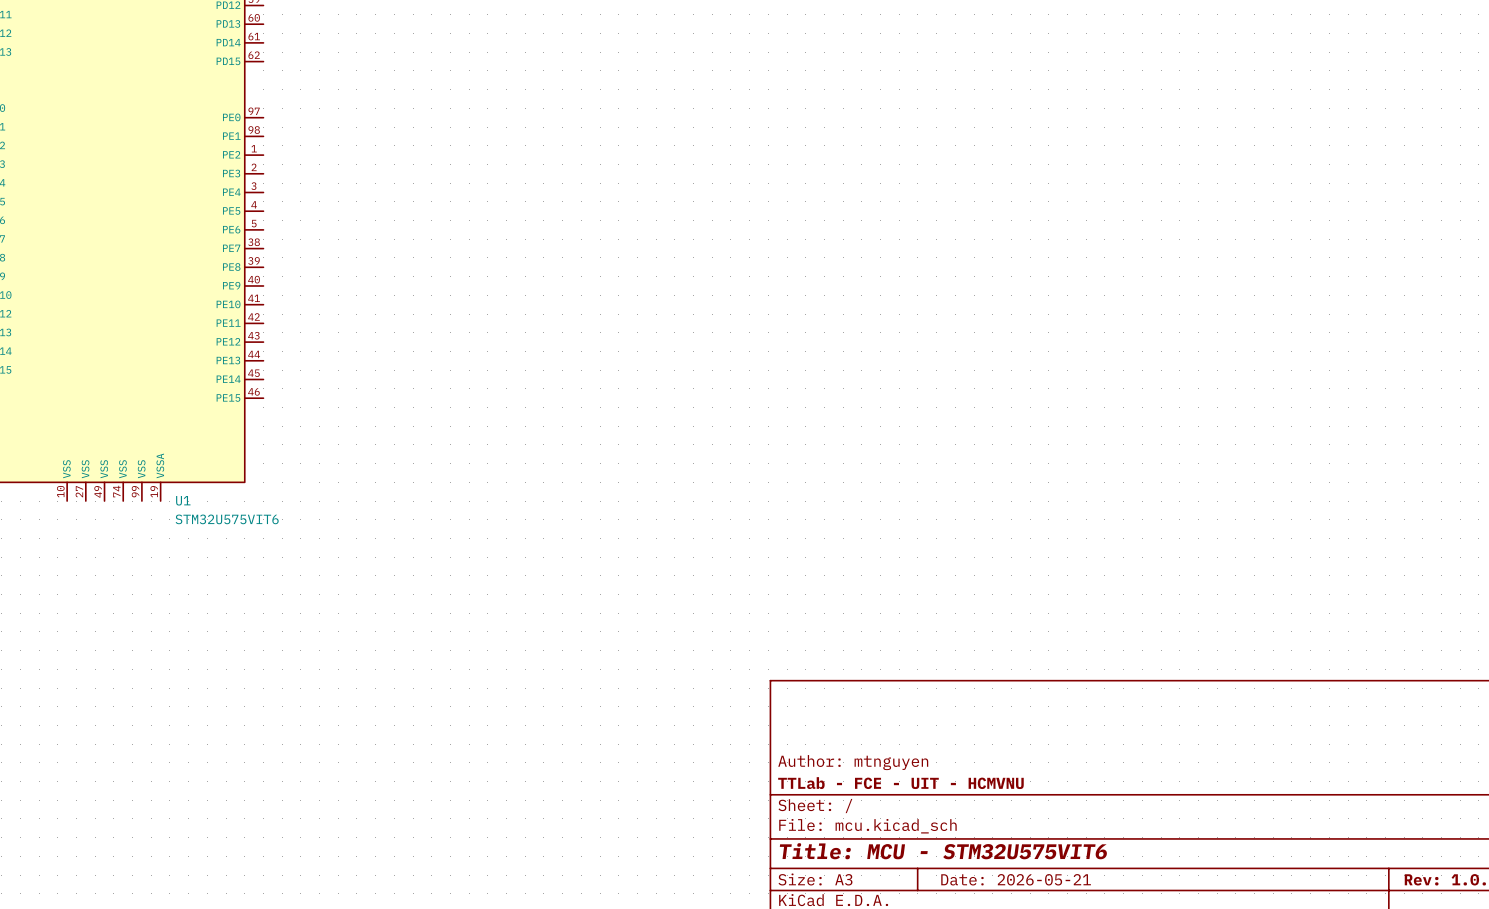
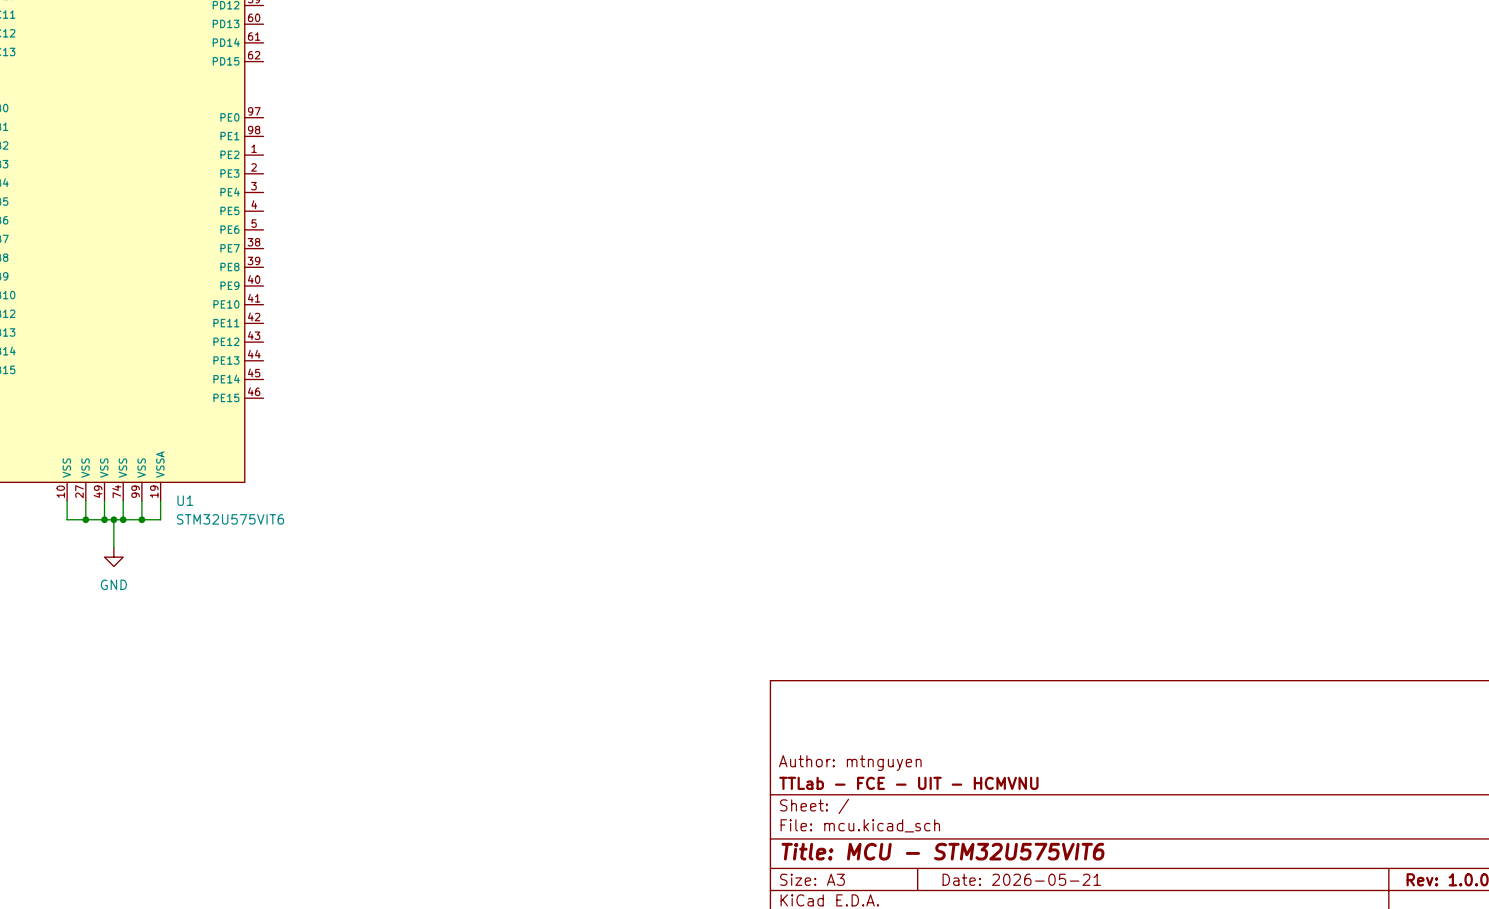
wire: none -> (67, 501) (67, 519) (160, 519) (160, 501)
wire: none -> (85, 501) (85, 519)
wire: none -> (104, 501) (104, 519)
wire: none -> (123, 501) (123, 519)
wire: none -> (141, 501) (141, 519)
junction: none -> (85, 519)
junction: none -> (104, 519)
wire: none -> (113, 519) (113, 547)
junction: none -> (113, 519)
junction: none -> (123, 519)
junction: none -> (141, 519)
power symbol: none -> GND (113, 557)

